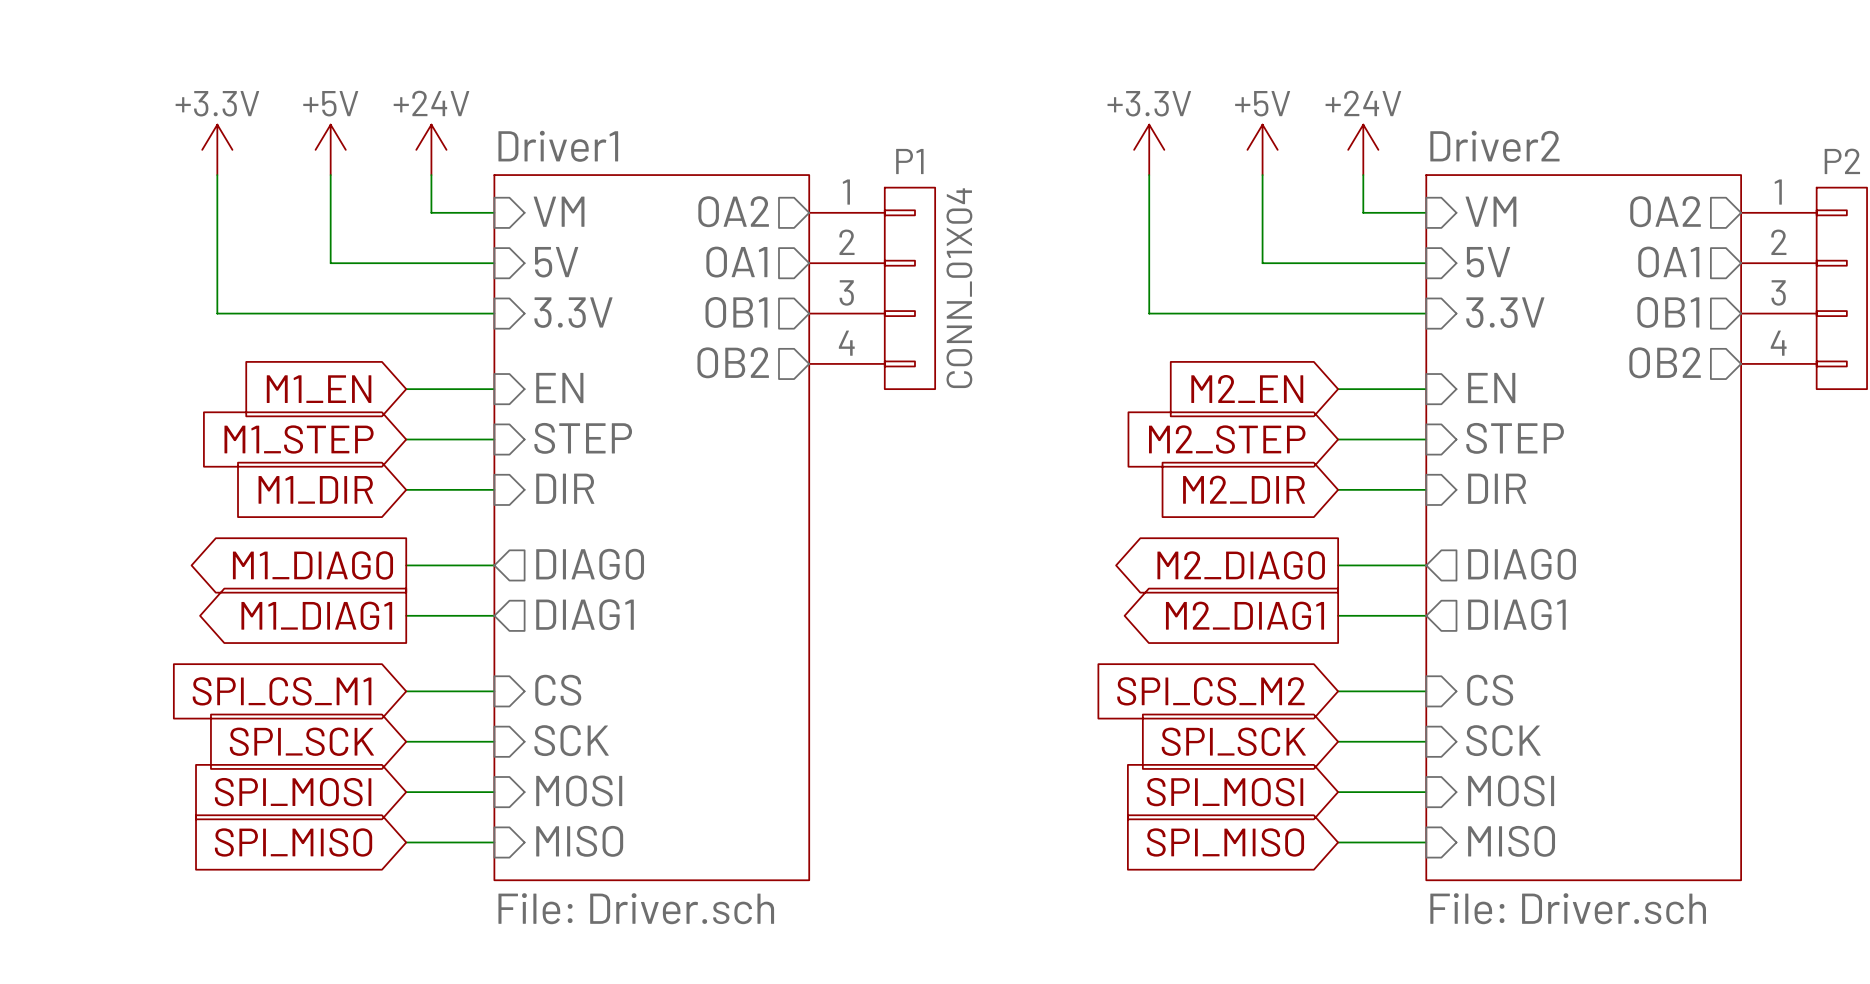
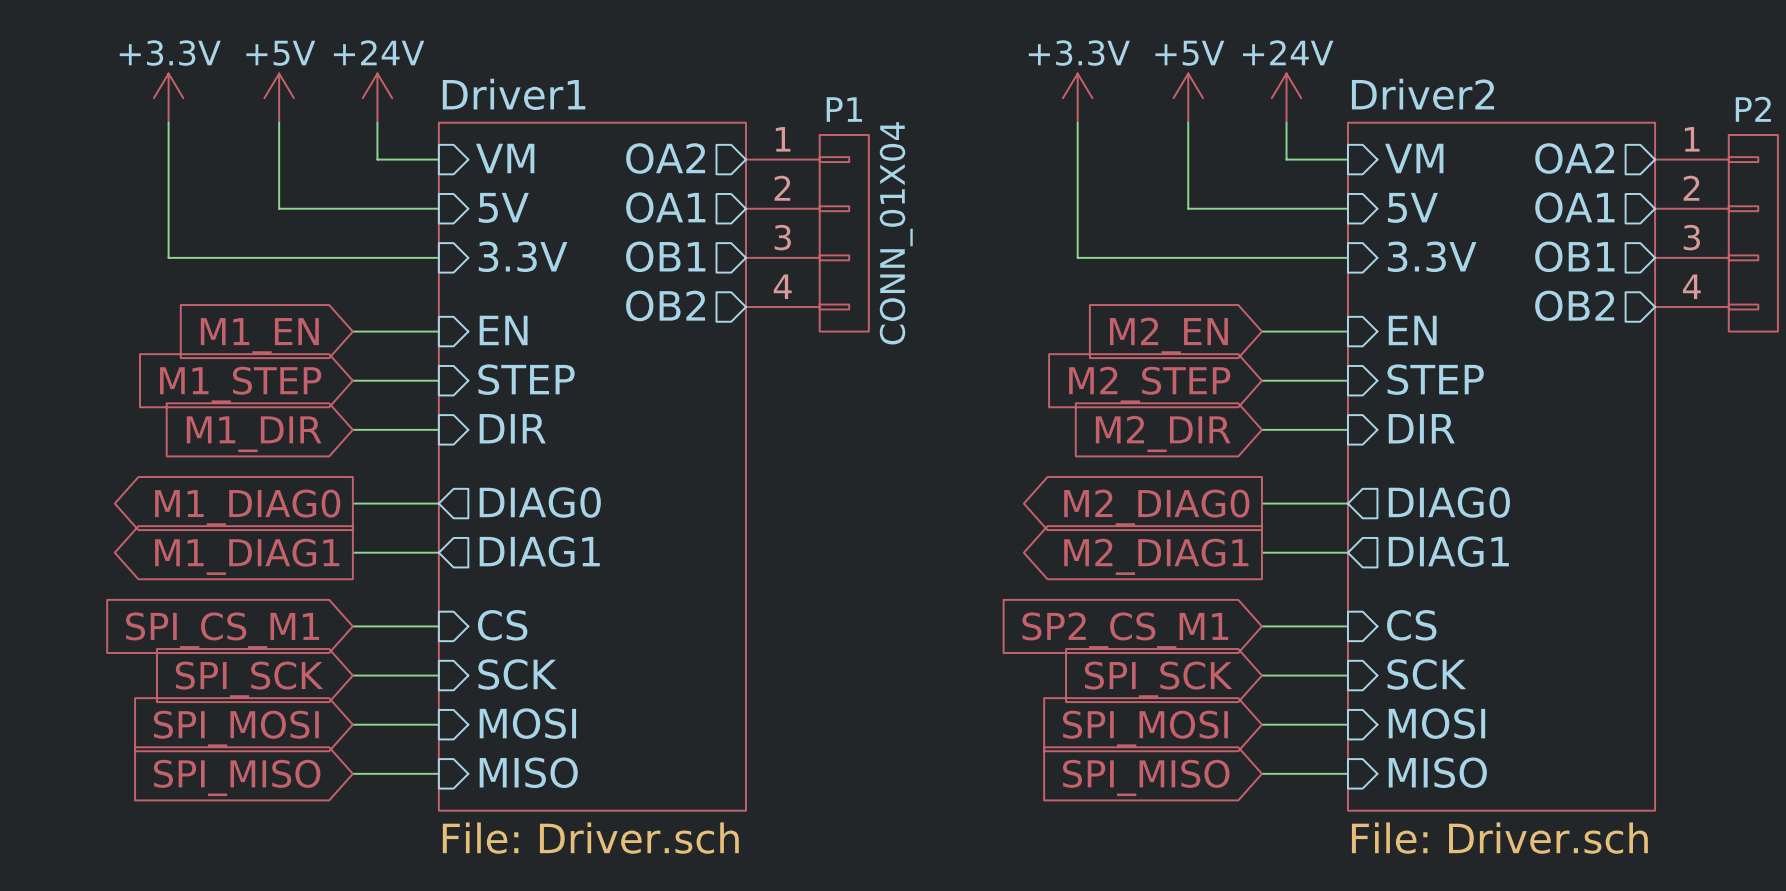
global label: SPI_CS_M2 (1210, 691) -> SP2_CS_M1 (1125, 630)

